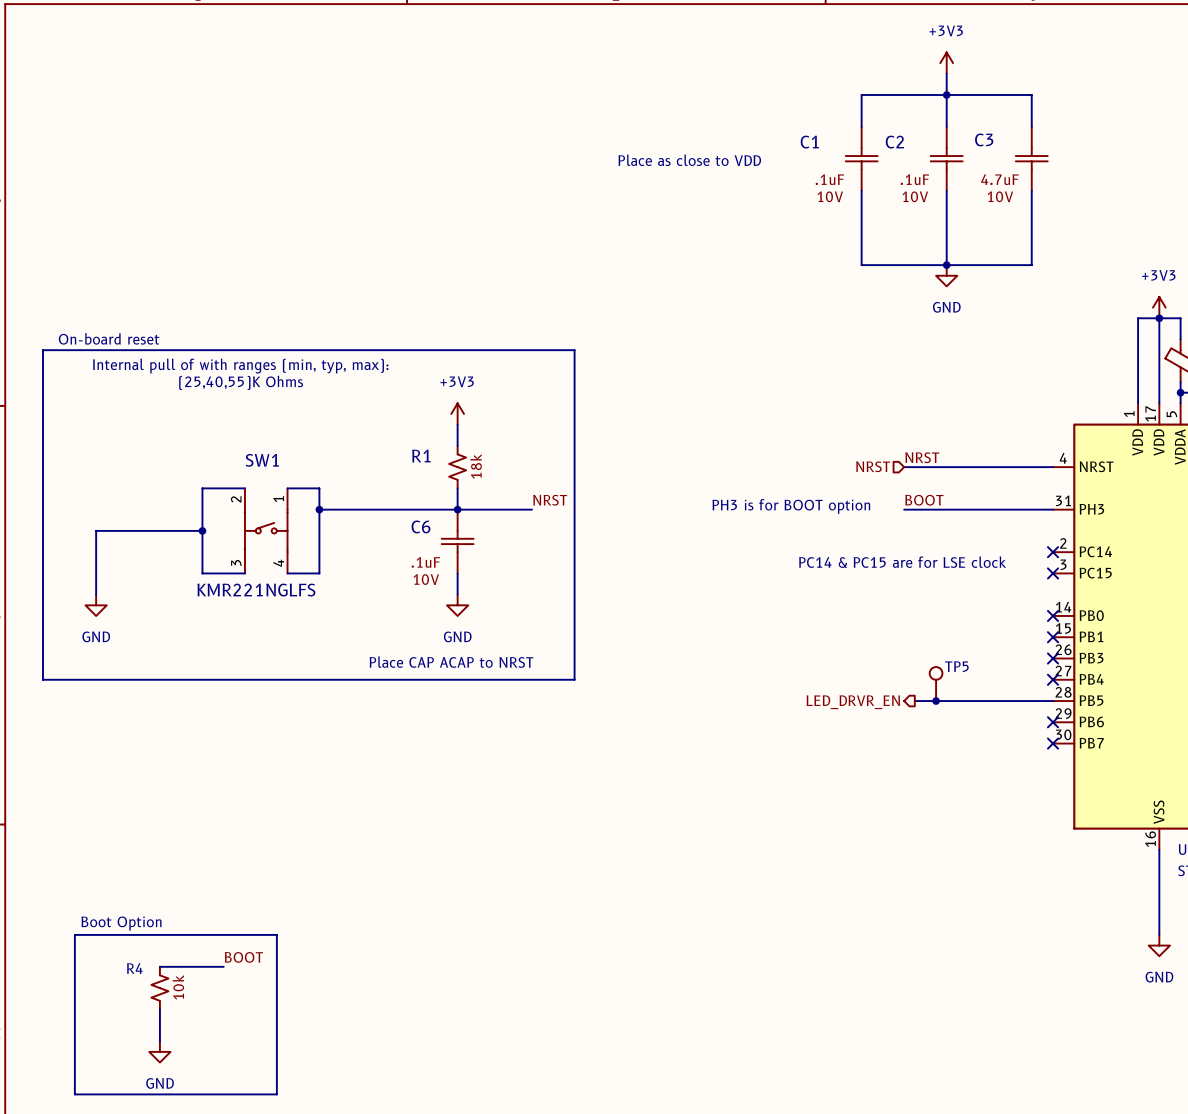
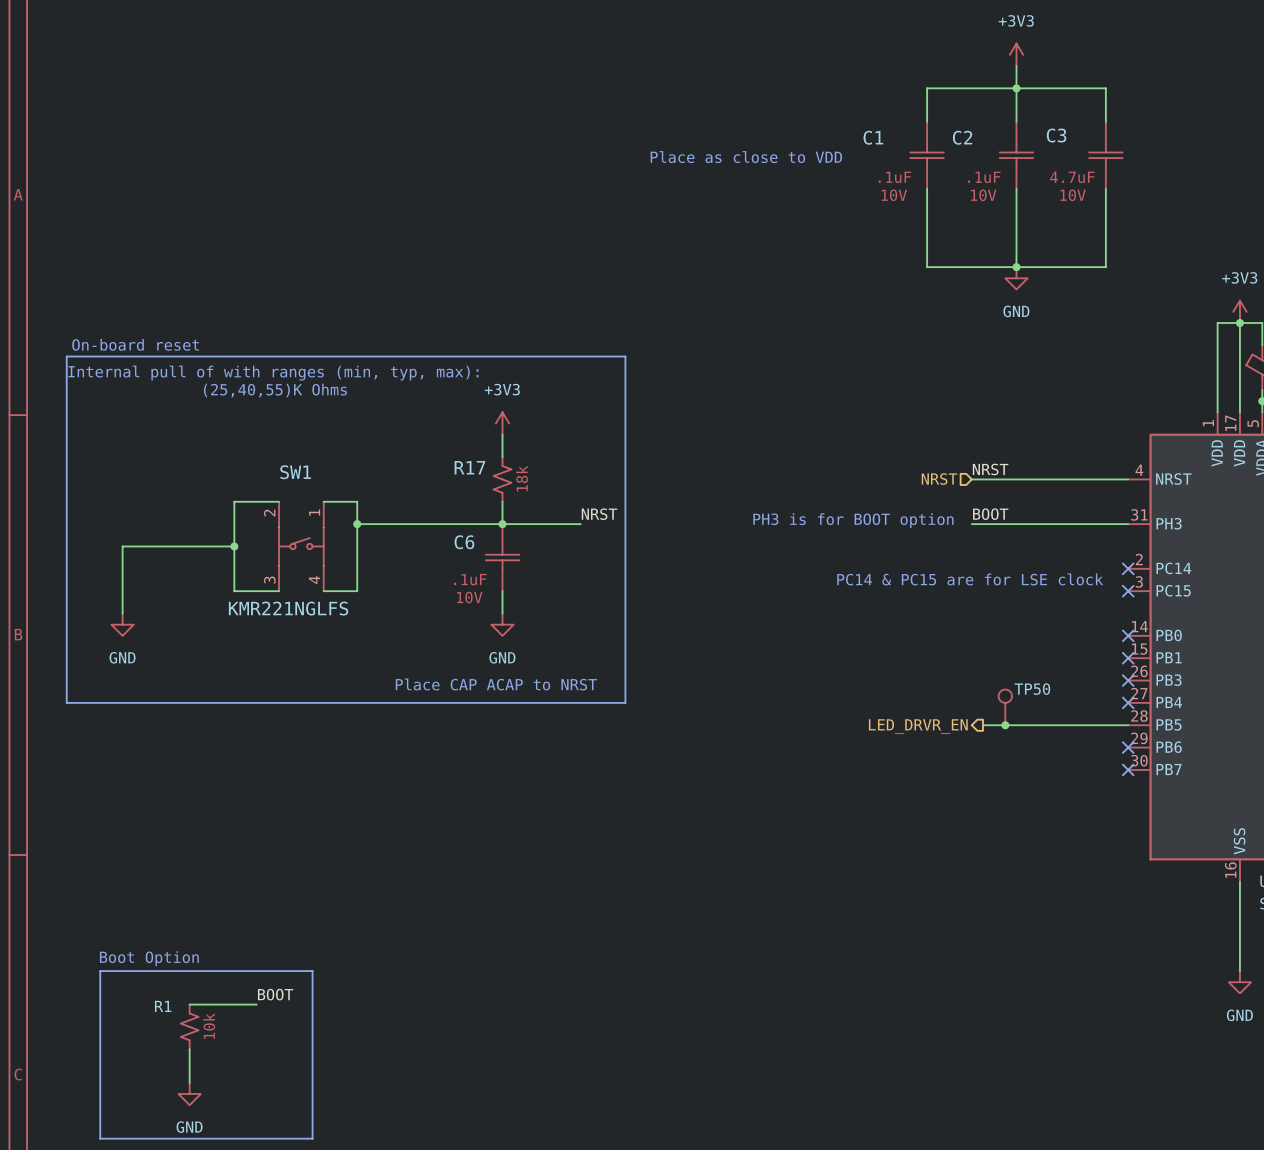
R1 name: R1 (421, 456) -> R17 (469, 467)
TP5 name: TP5 (956, 666) -> TP50 (1032, 689)
R4 name: R4 (134, 968) -> R1 (163, 1006)

